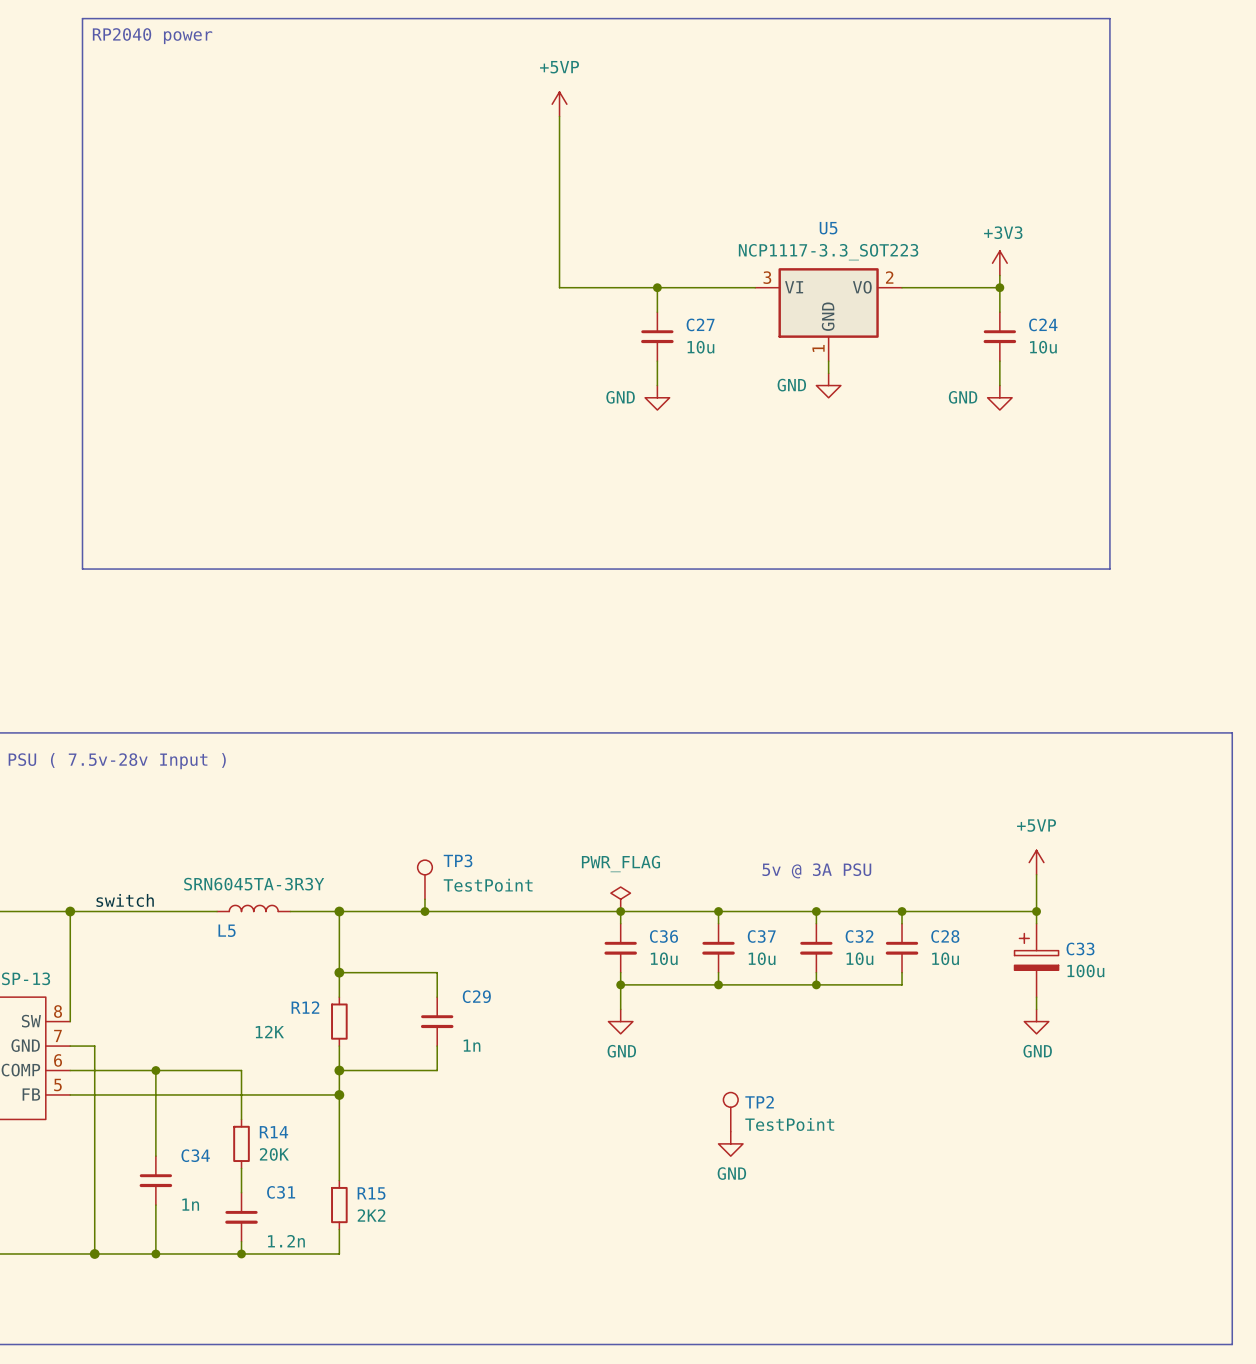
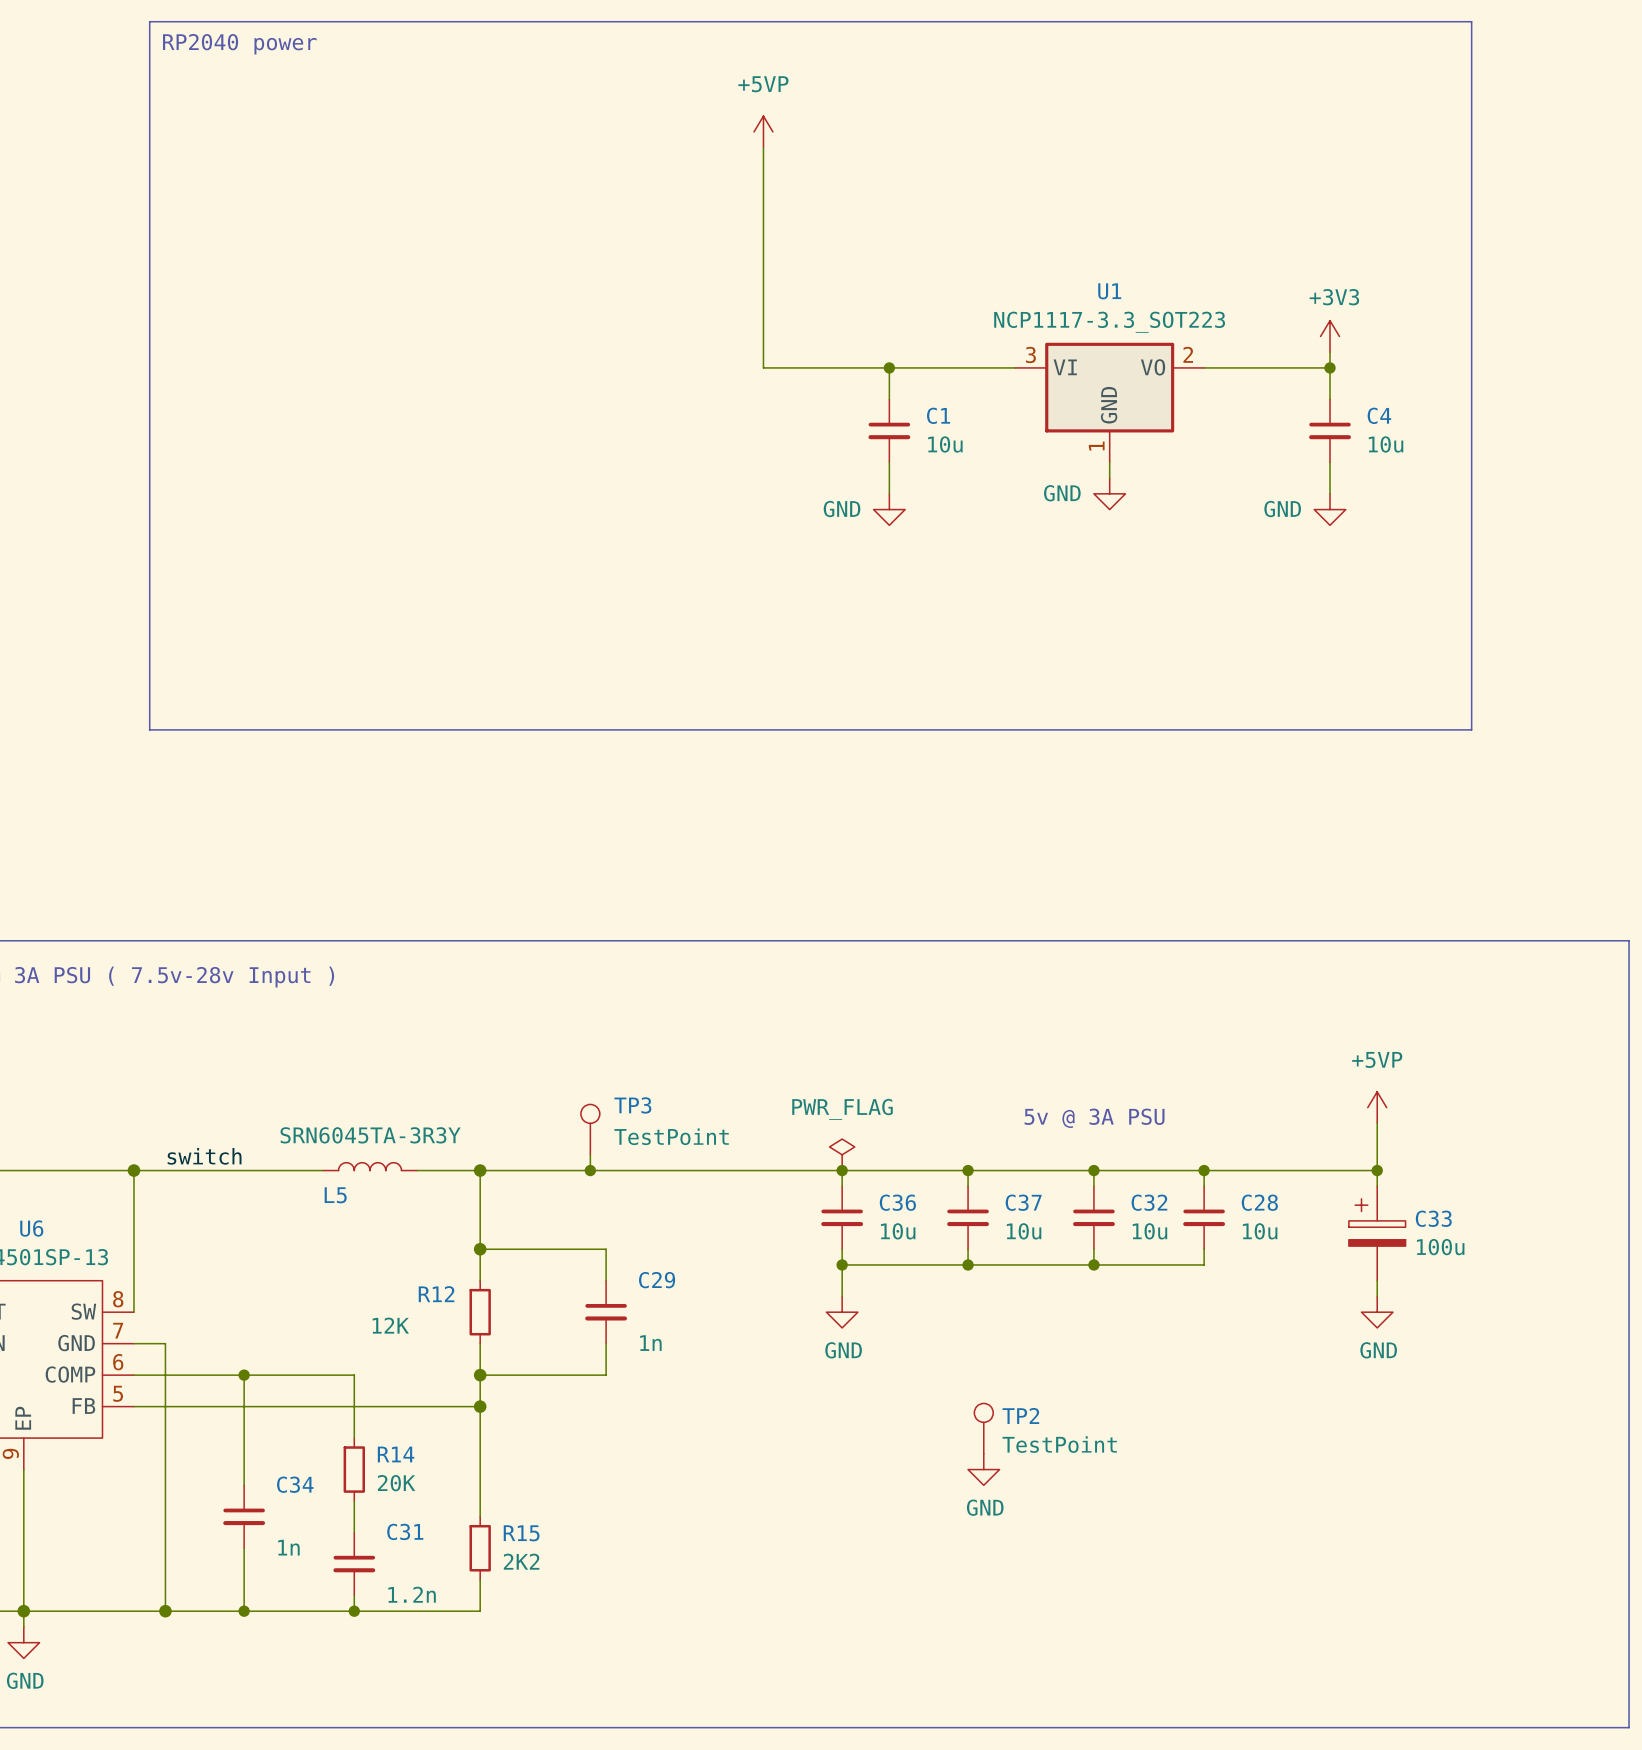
U5 name: U5 (828, 228) -> U1 (1109, 291)
C27 name: C27 (700, 324) -> C1 (938, 415)
C24 name: C24 (1043, 324) -> C4 (1379, 415)

